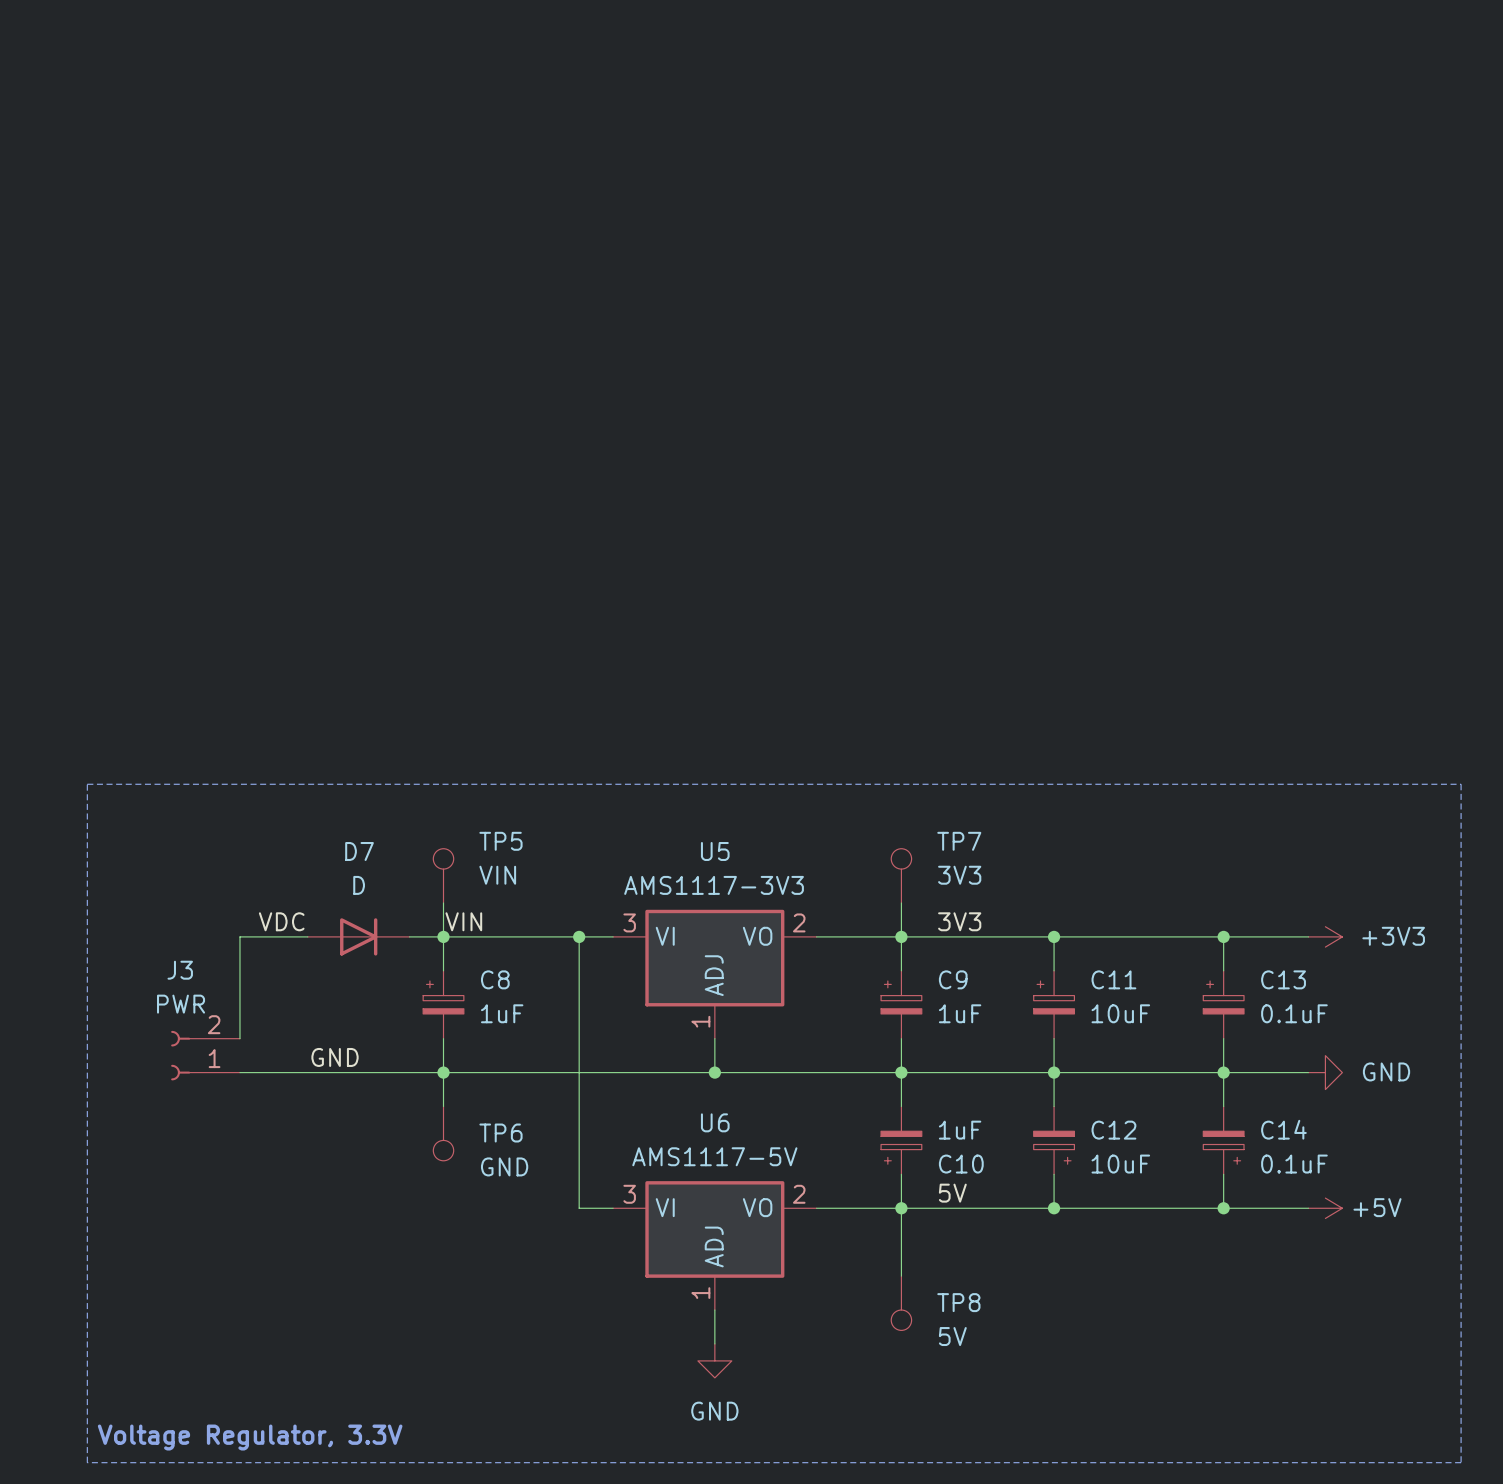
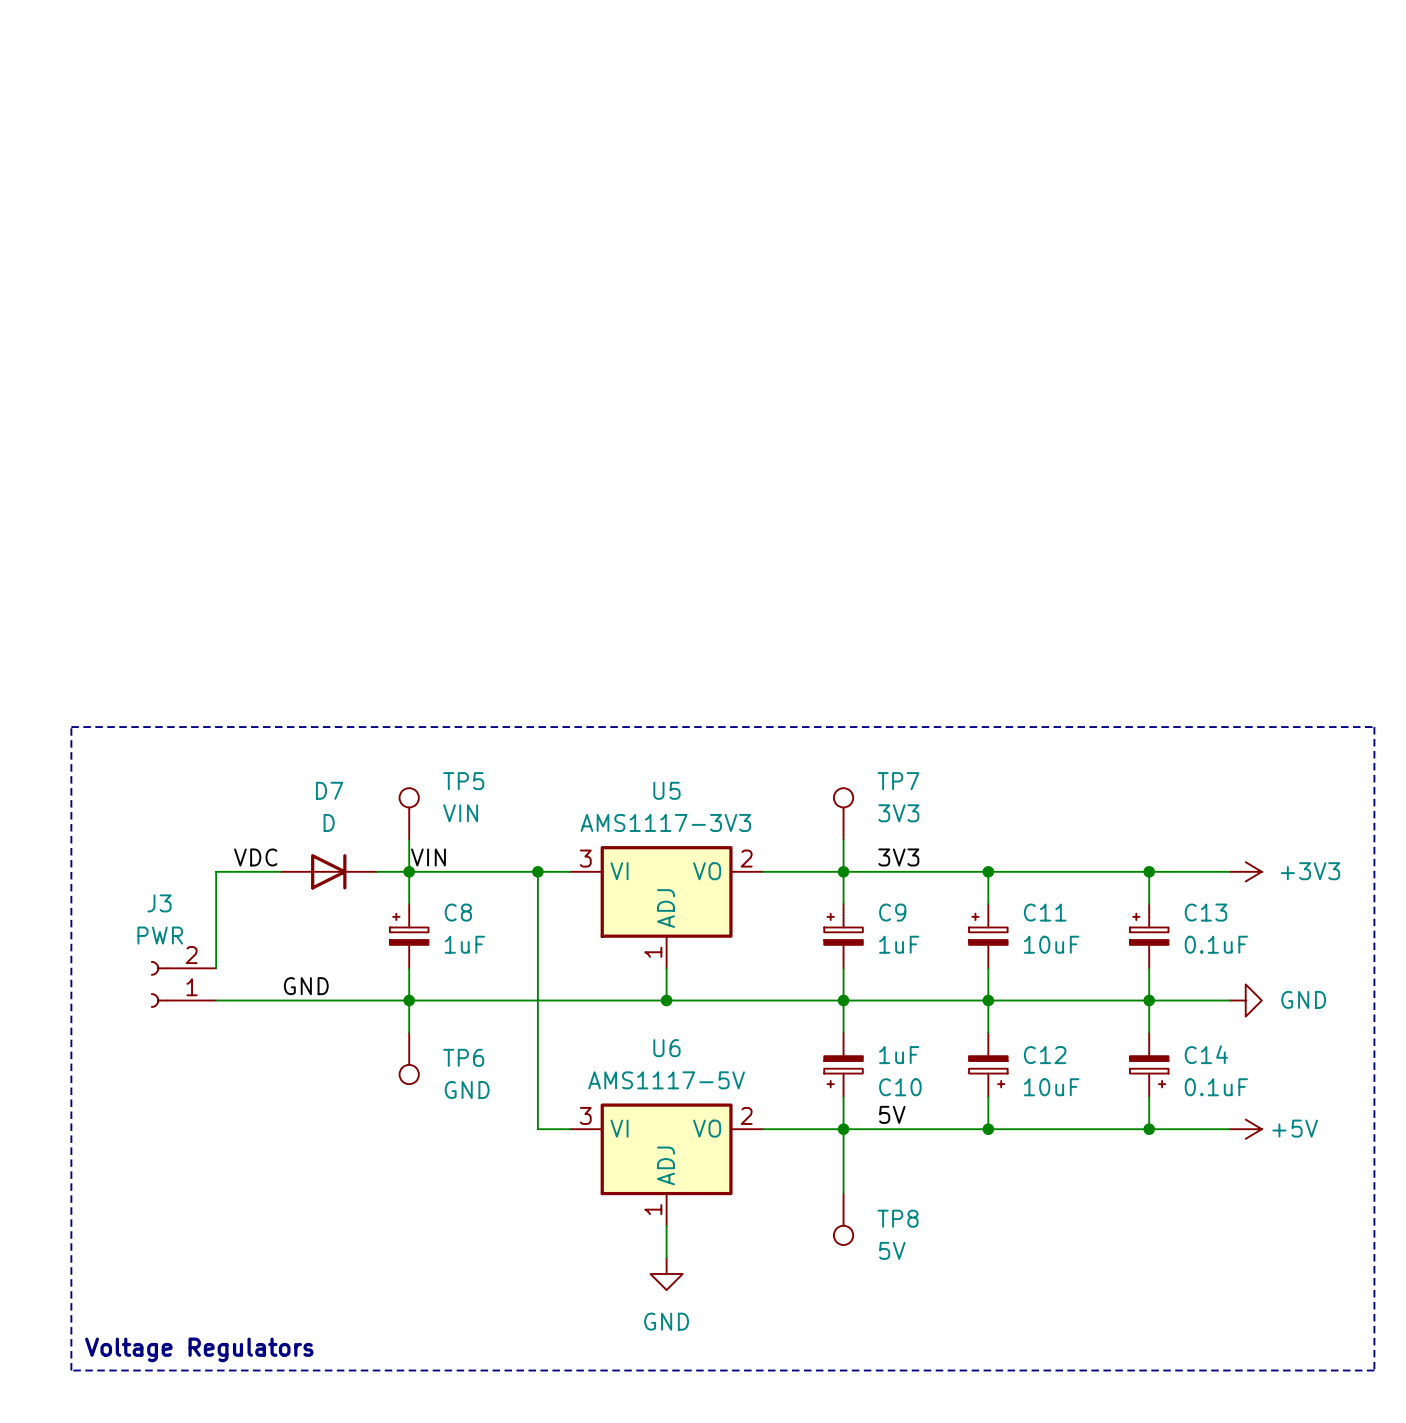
text: Voltage Regulator, 3.3V (250, 1437) -> Voltage Regulators (199, 1349)

